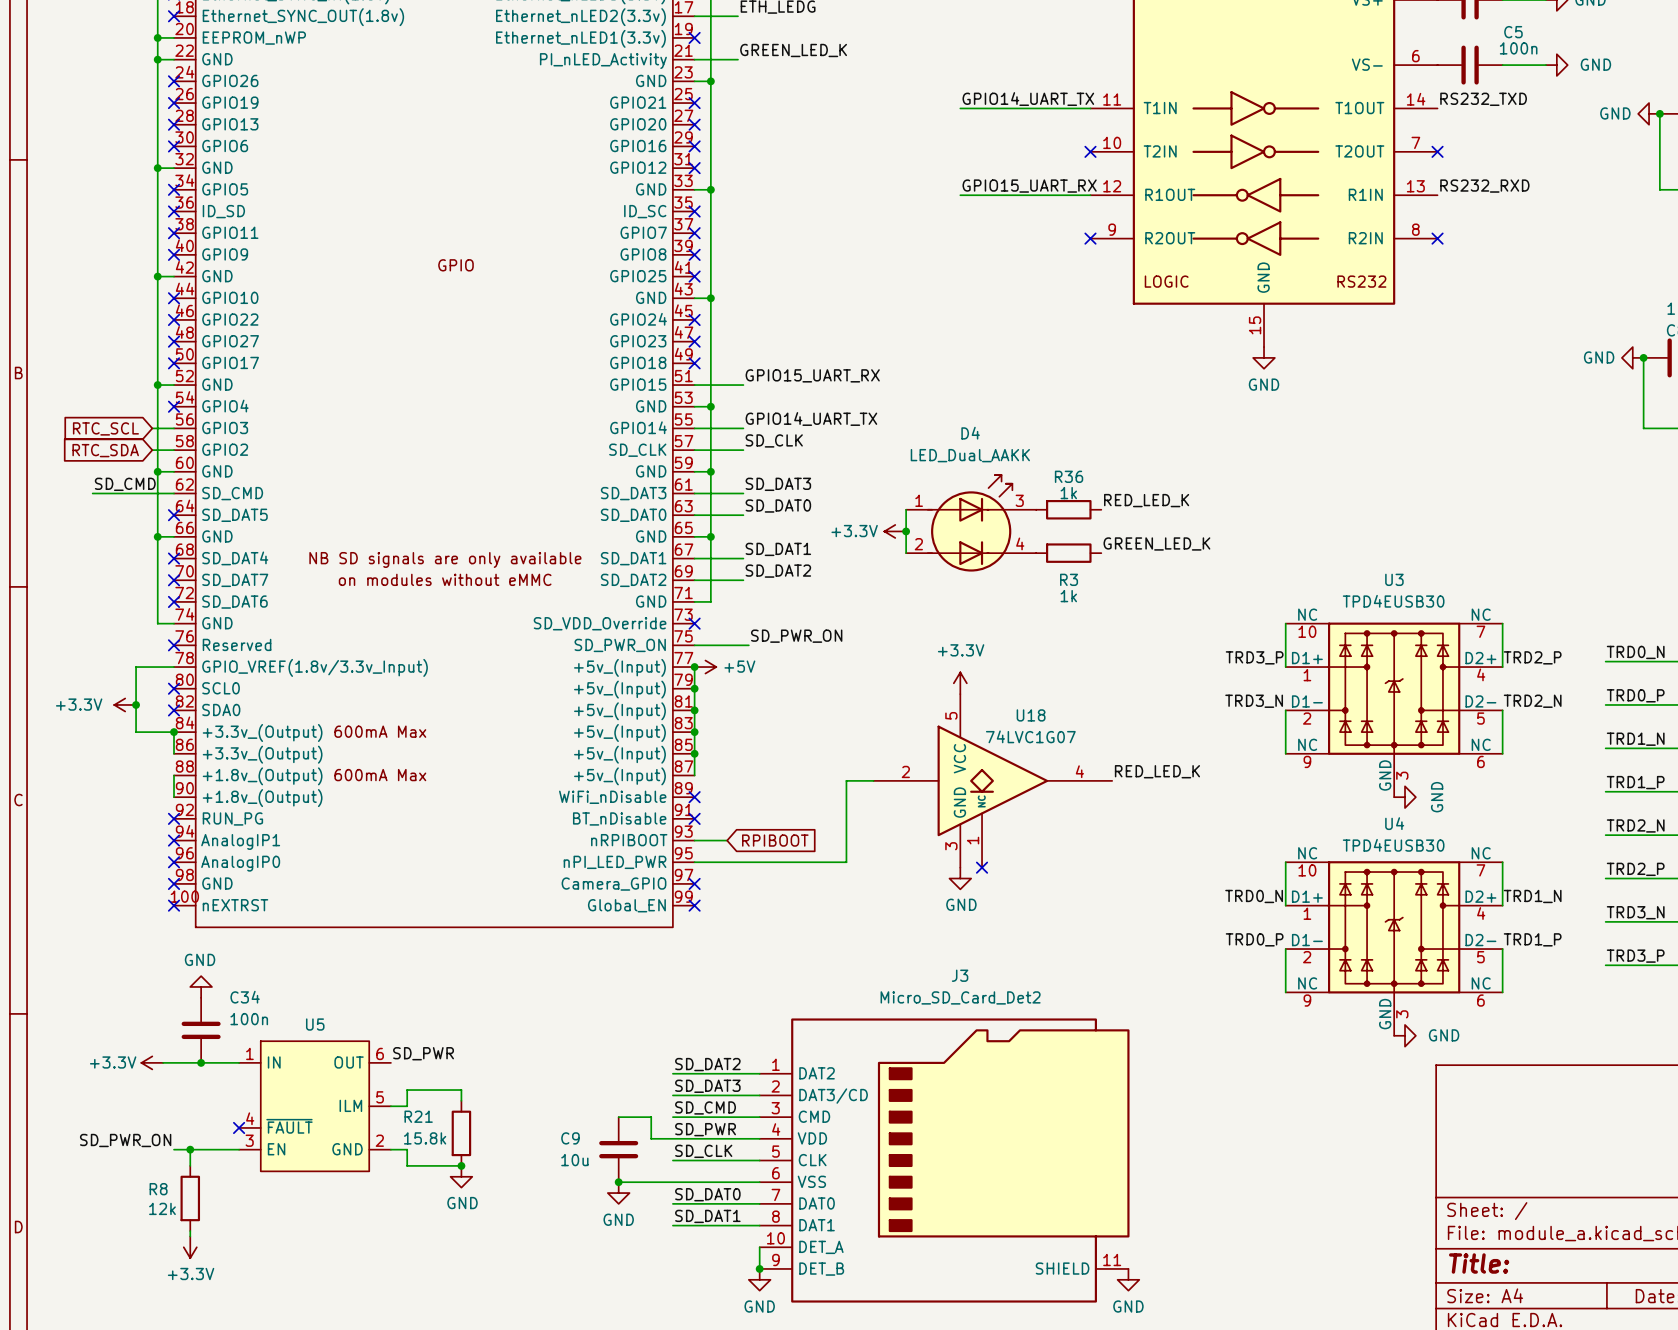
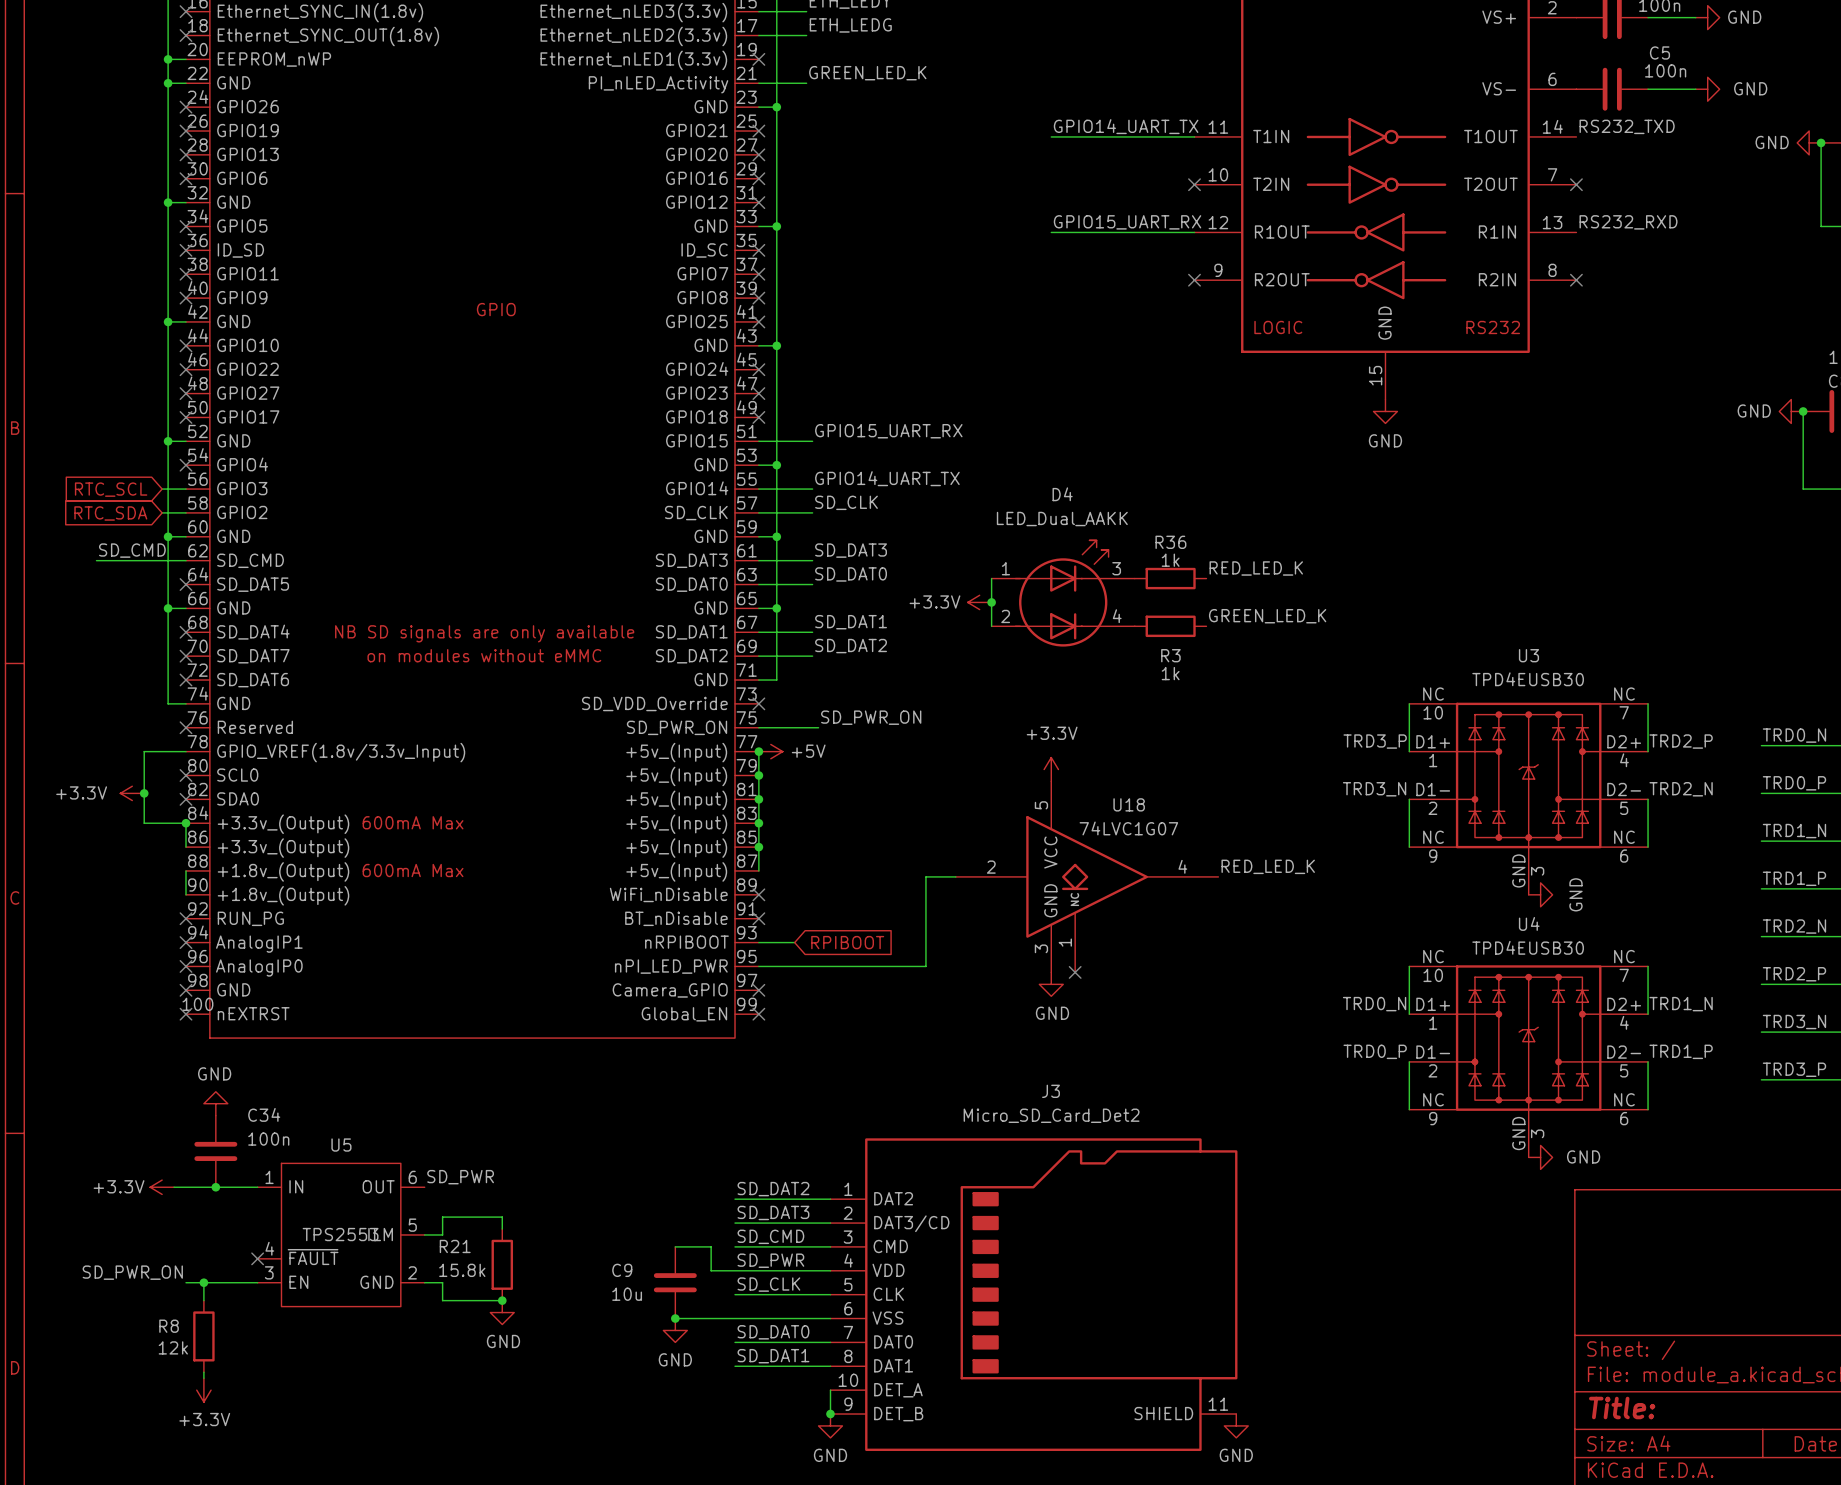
U5 value: none -> TPS2553 (340, 1234)

